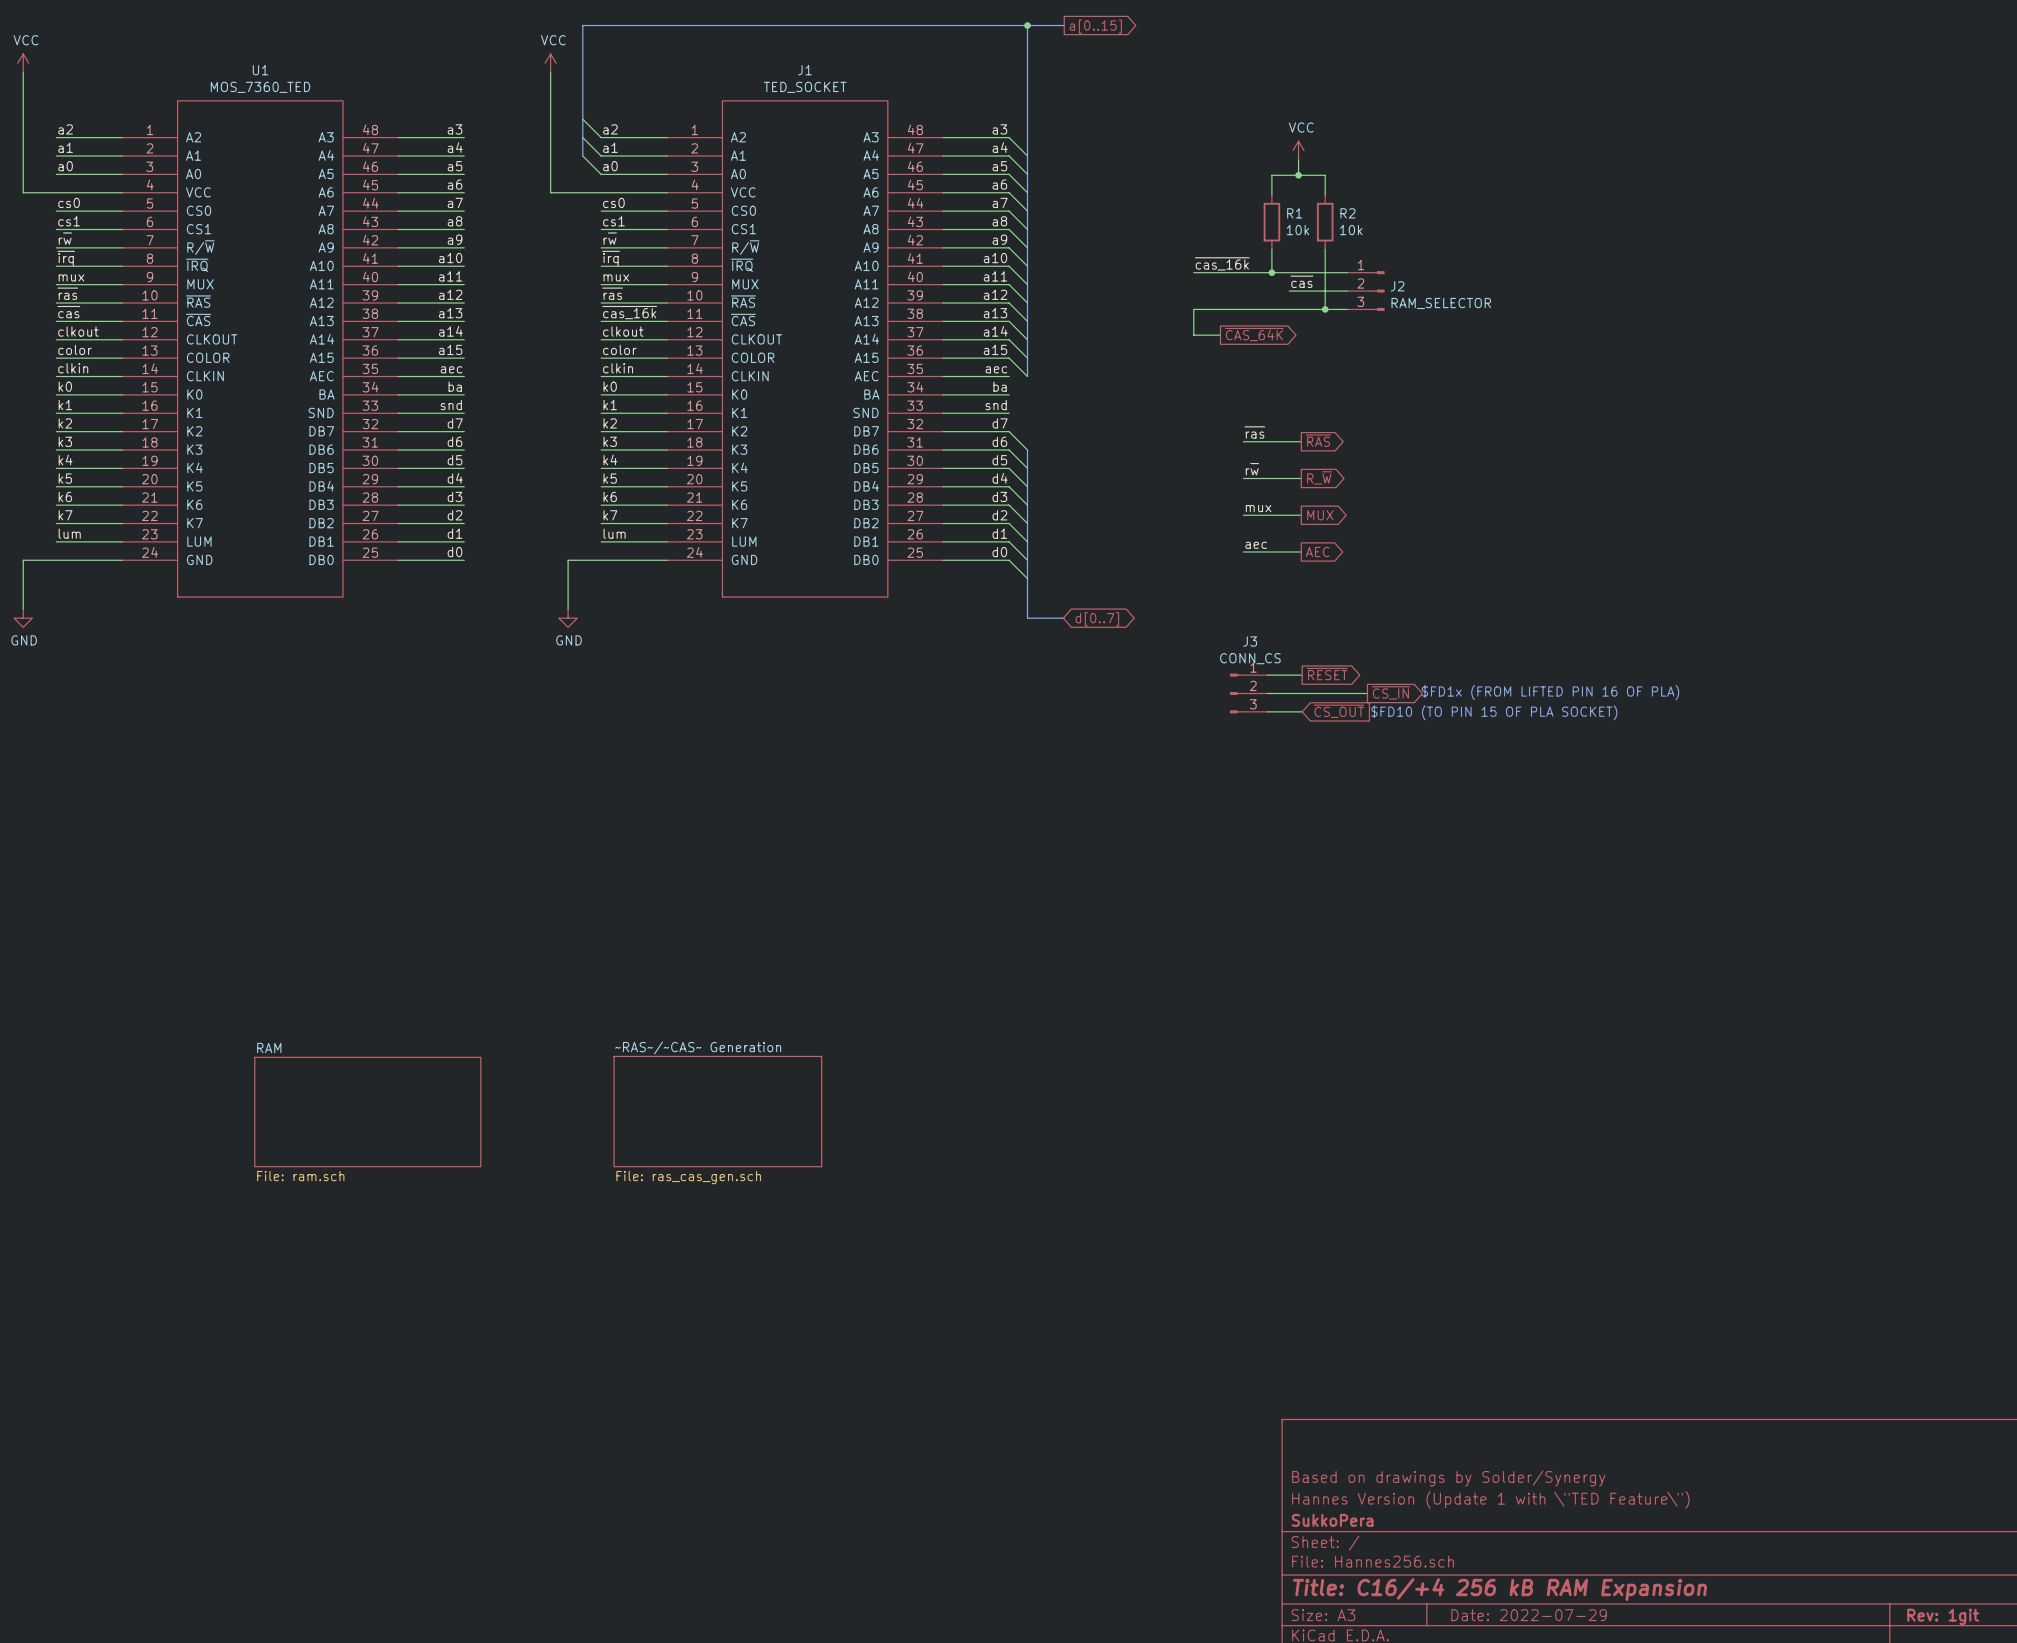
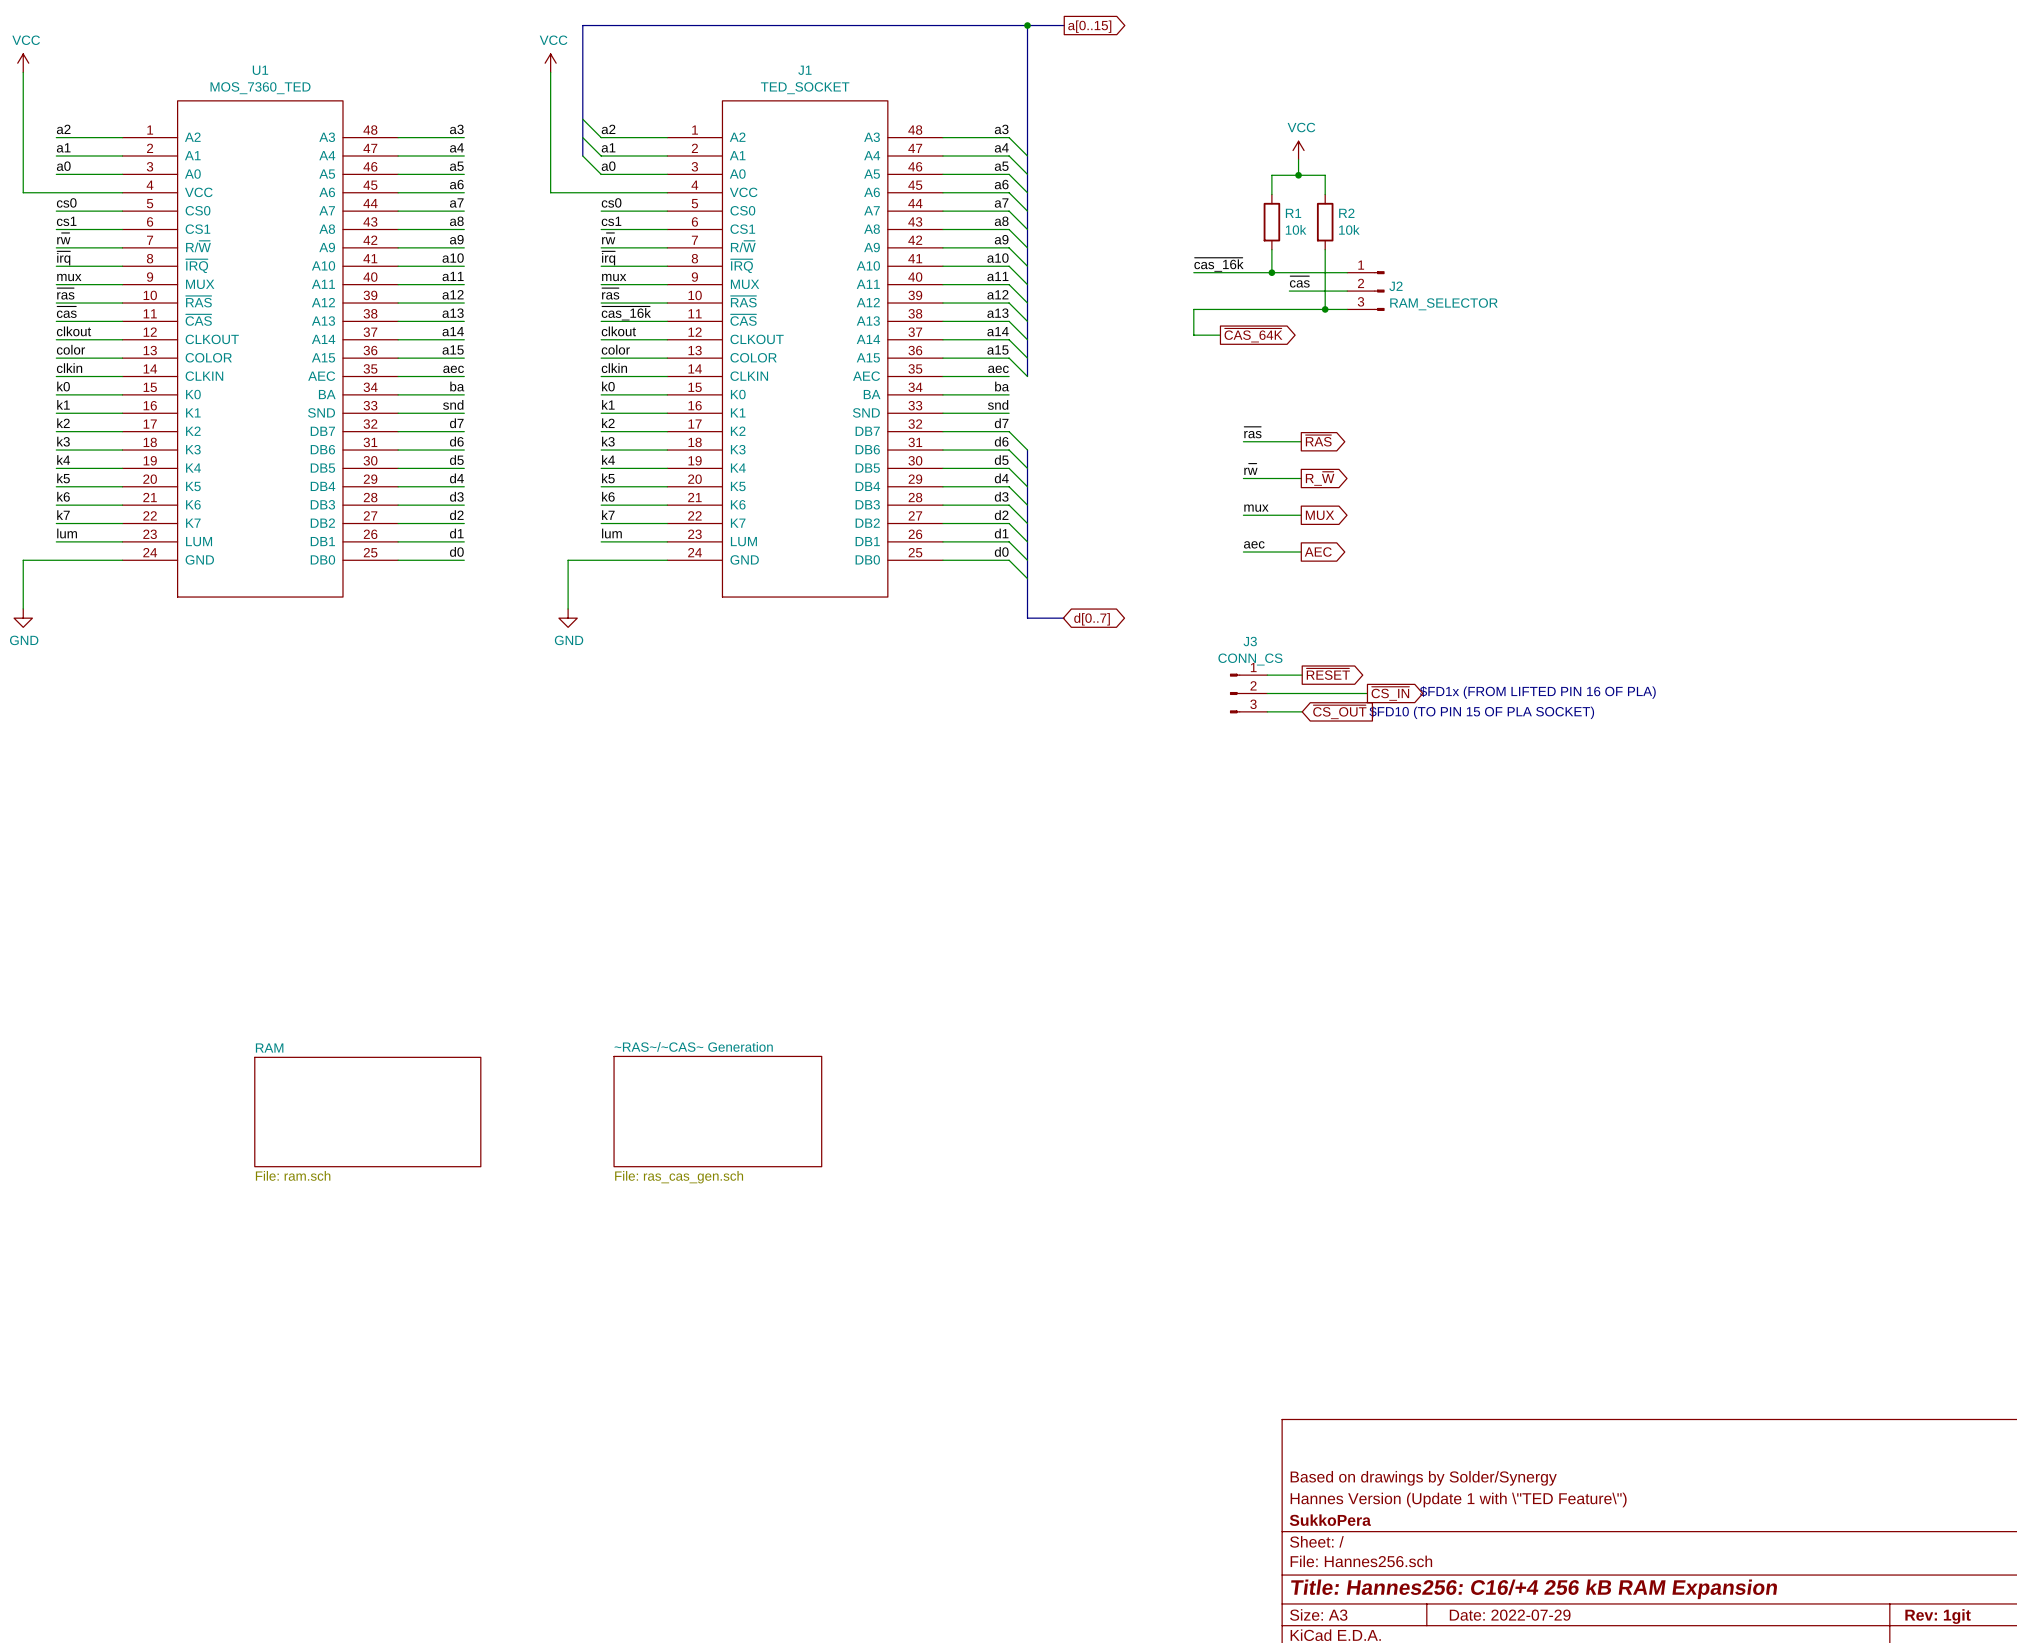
title block: Title: C16/+4 256 kB RAM Expansion (1500, 1589) -> Title: Hannes256: C16/+4 256 kB RAM Expansion (1534, 1589)

